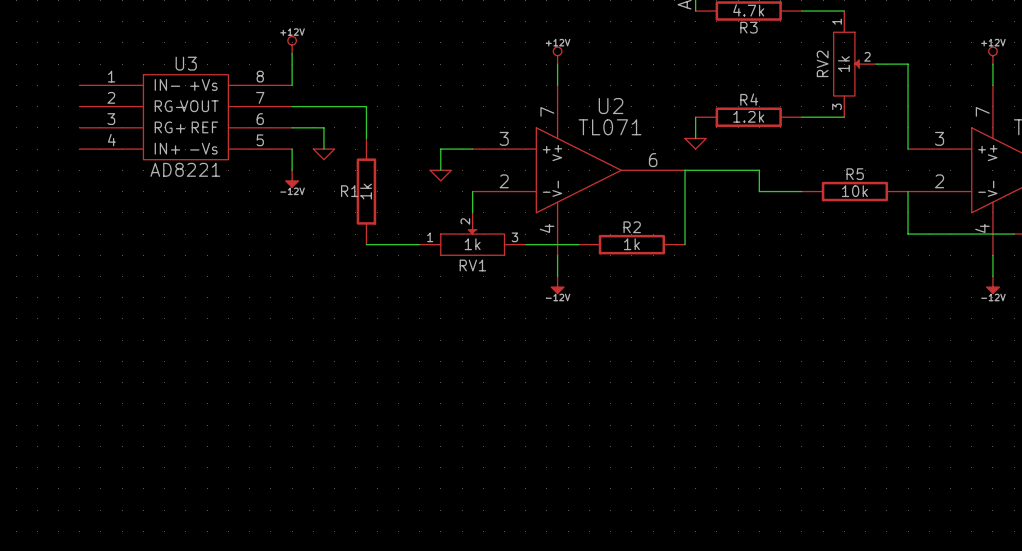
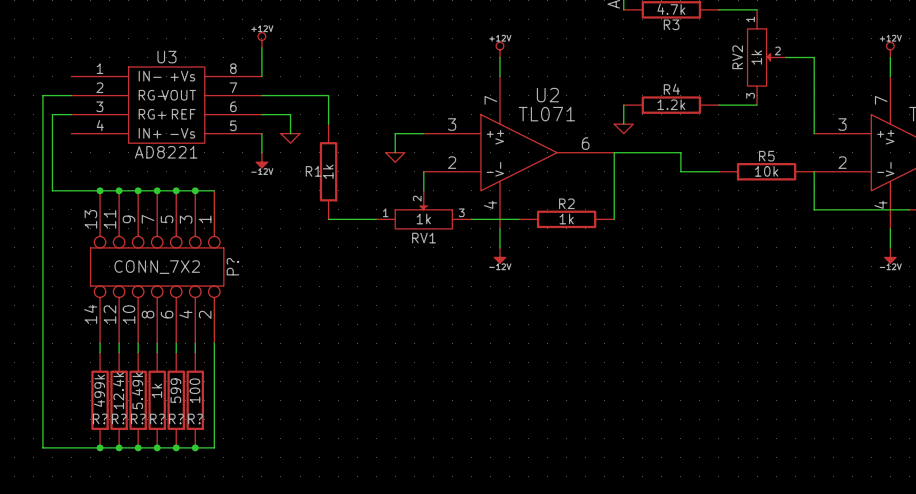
wire: none -> (71, 95) (42, 95) (42, 447) (214, 447) (214, 343)
wire: none -> (71, 114) (52, 114) (52, 190) (214, 190)
junction: none -> (100, 190)
junction: none -> (119, 190)
junction: none -> (138, 190)
junction: none -> (157, 190)
junction: none -> (176, 190)
junction: none -> (195, 190)
P?: none -> CONN_7X2 (157, 266)
wire: none -> (100, 343) (100, 352)
wire: none -> (119, 343) (119, 352)
wire: none -> (138, 343) (138, 352)
wire: none -> (157, 343) (157, 352)
wire: none -> (176, 343) (176, 352)
wire: none -> (195, 343) (195, 352)
R?: none -> 499k (100, 400)
R?: none -> 12.4k (119, 400)
R?: none -> 5.49k (138, 400)
R?: none -> 1k (157, 400)
R?: none -> 599 (176, 400)
R?: none -> 100 (195, 400)
junction: none -> (100, 447)
junction: none -> (119, 447)
junction: none -> (138, 447)
junction: none -> (157, 447)
junction: none -> (176, 447)
junction: none -> (195, 447)

